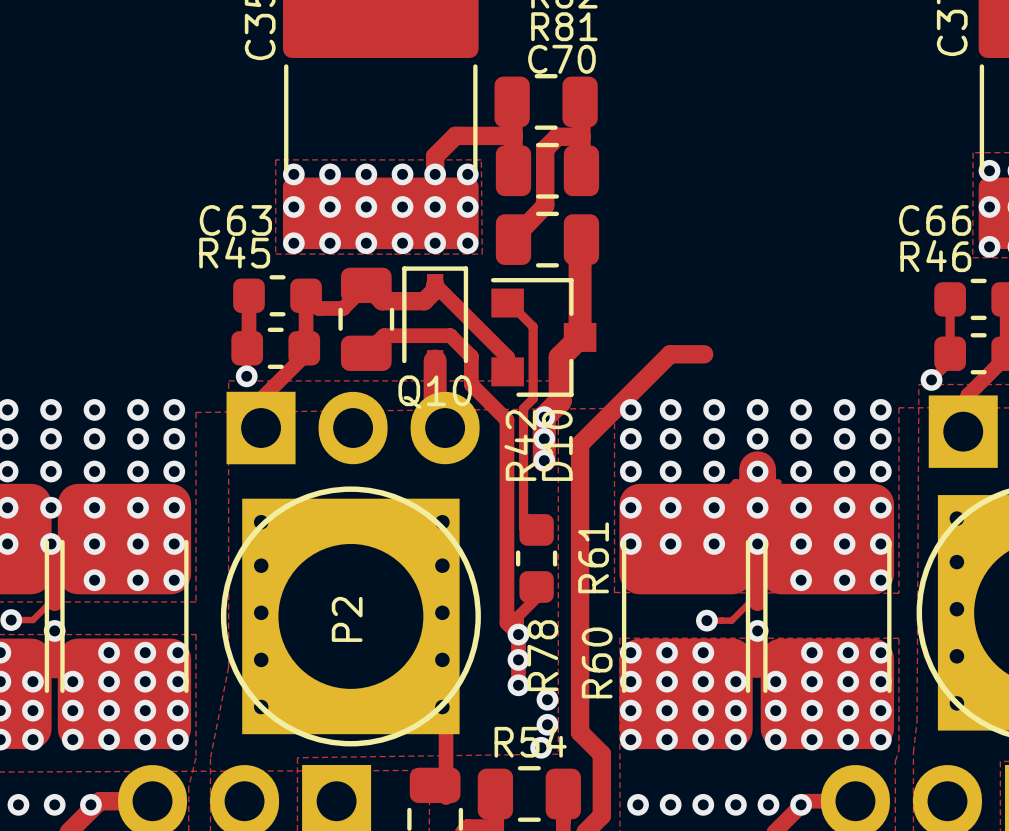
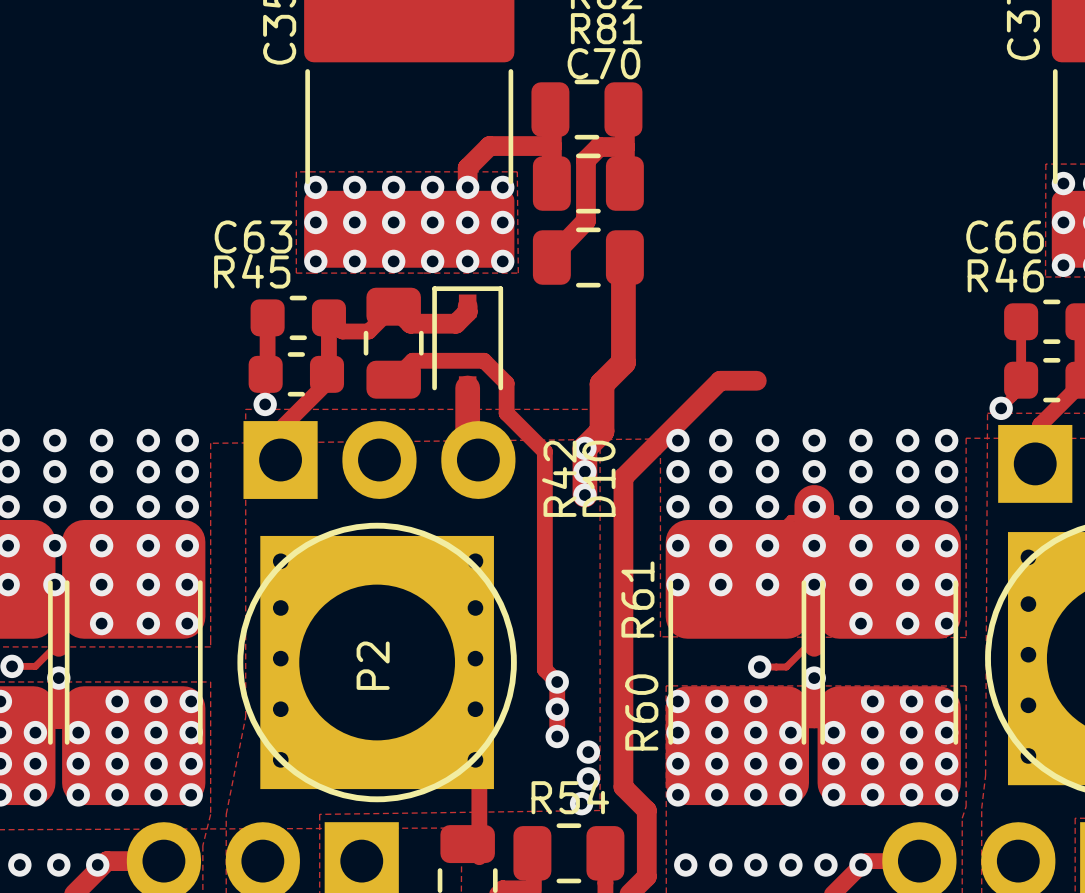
track: (435, 284) (507, 357) (507, 371) -> none
track: (507, 303) (533, 326) (533, 398) (523, 408) (523, 527) (536, 540) -> none
Q10: (543, 337) -> none
R78: (536, 558) -> none
track: (536, 597) (518, 615) (518, 634) -> none

